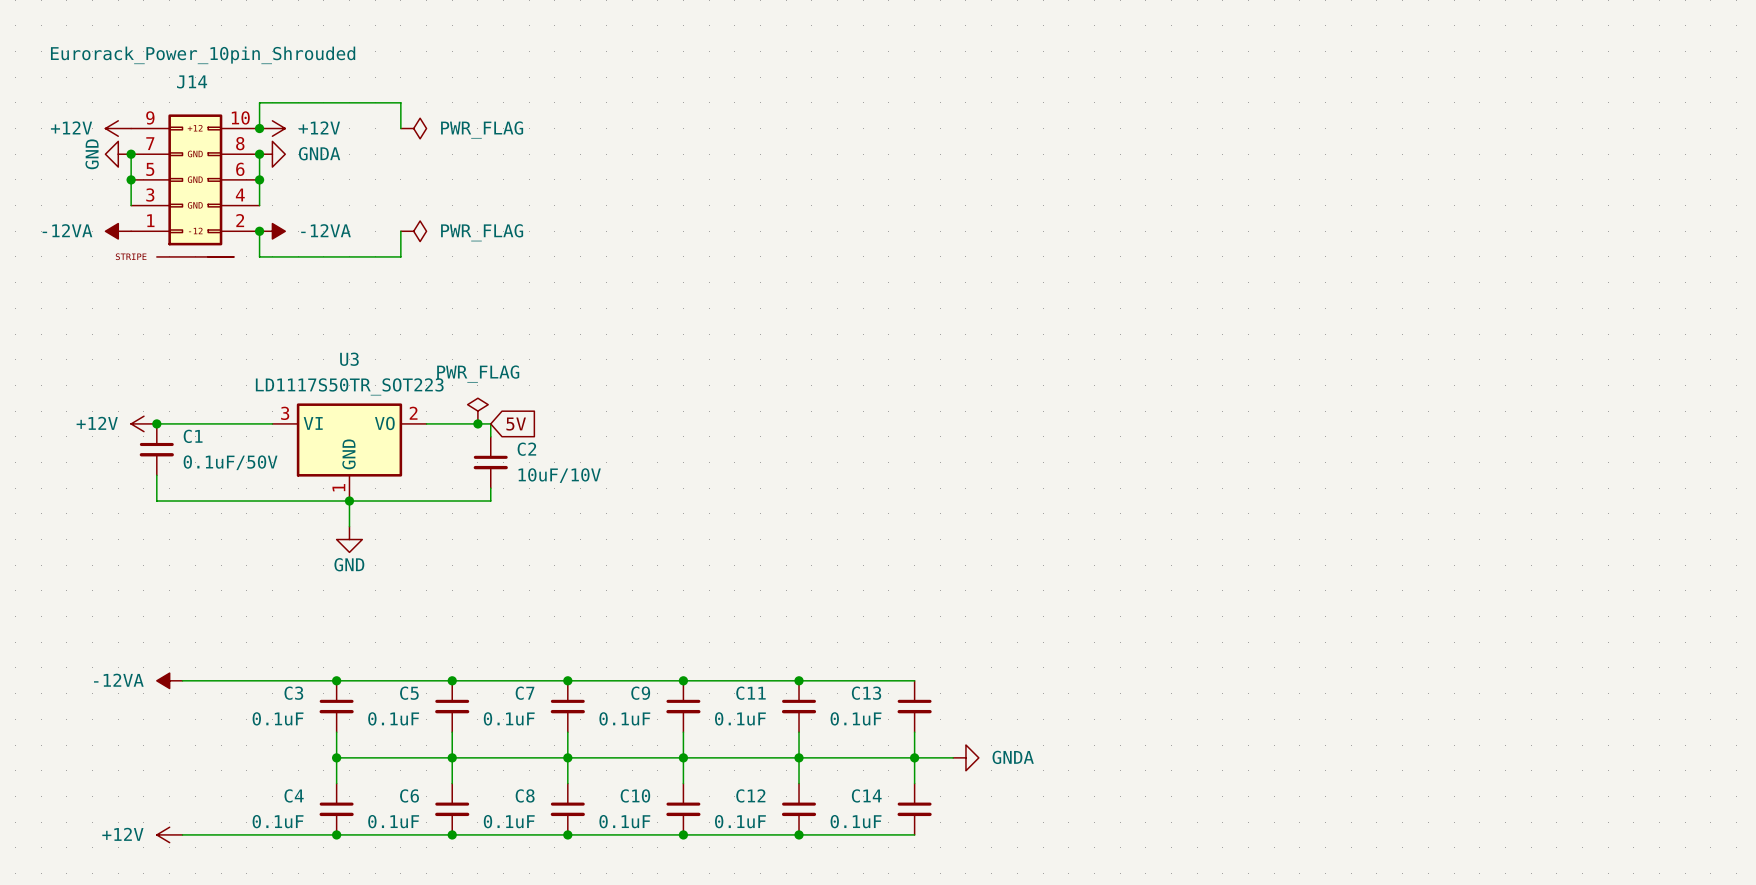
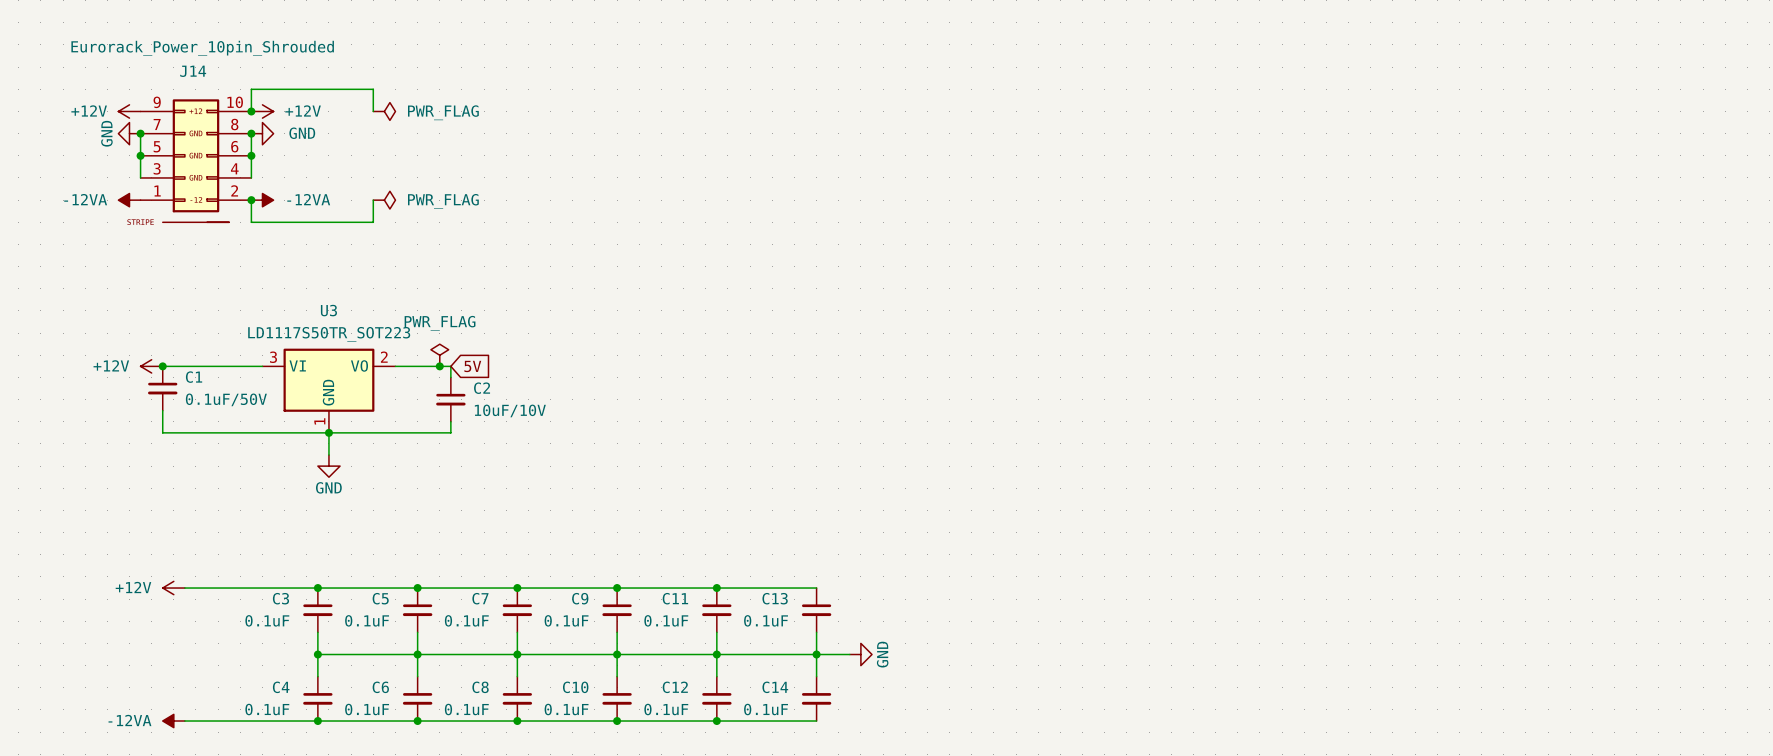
power symbol: GNDA (272, 154) -> GND (262, 133)
power symbol: -12VA (169, 680) -> +12V (173, 588)
power symbol: GNDA (965, 757) -> GND (860, 654)
power symbol: +12V (169, 834) -> -12VA (173, 721)

